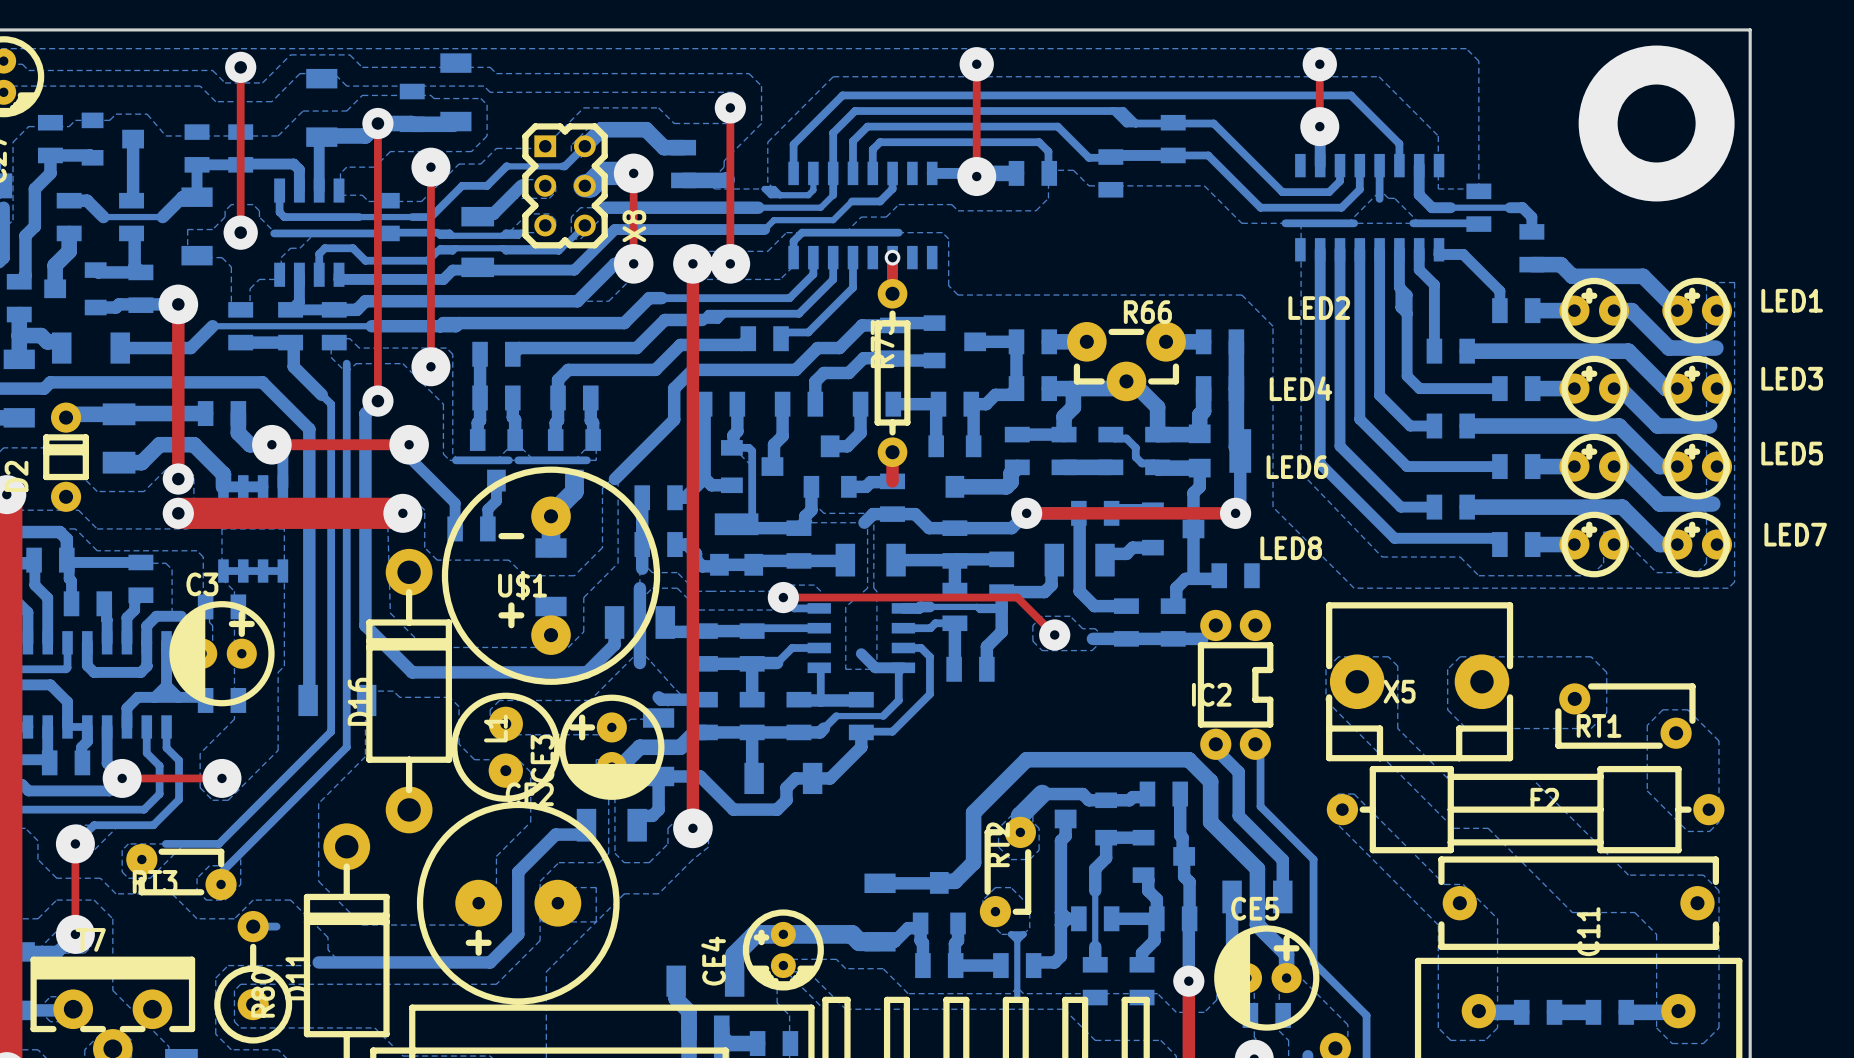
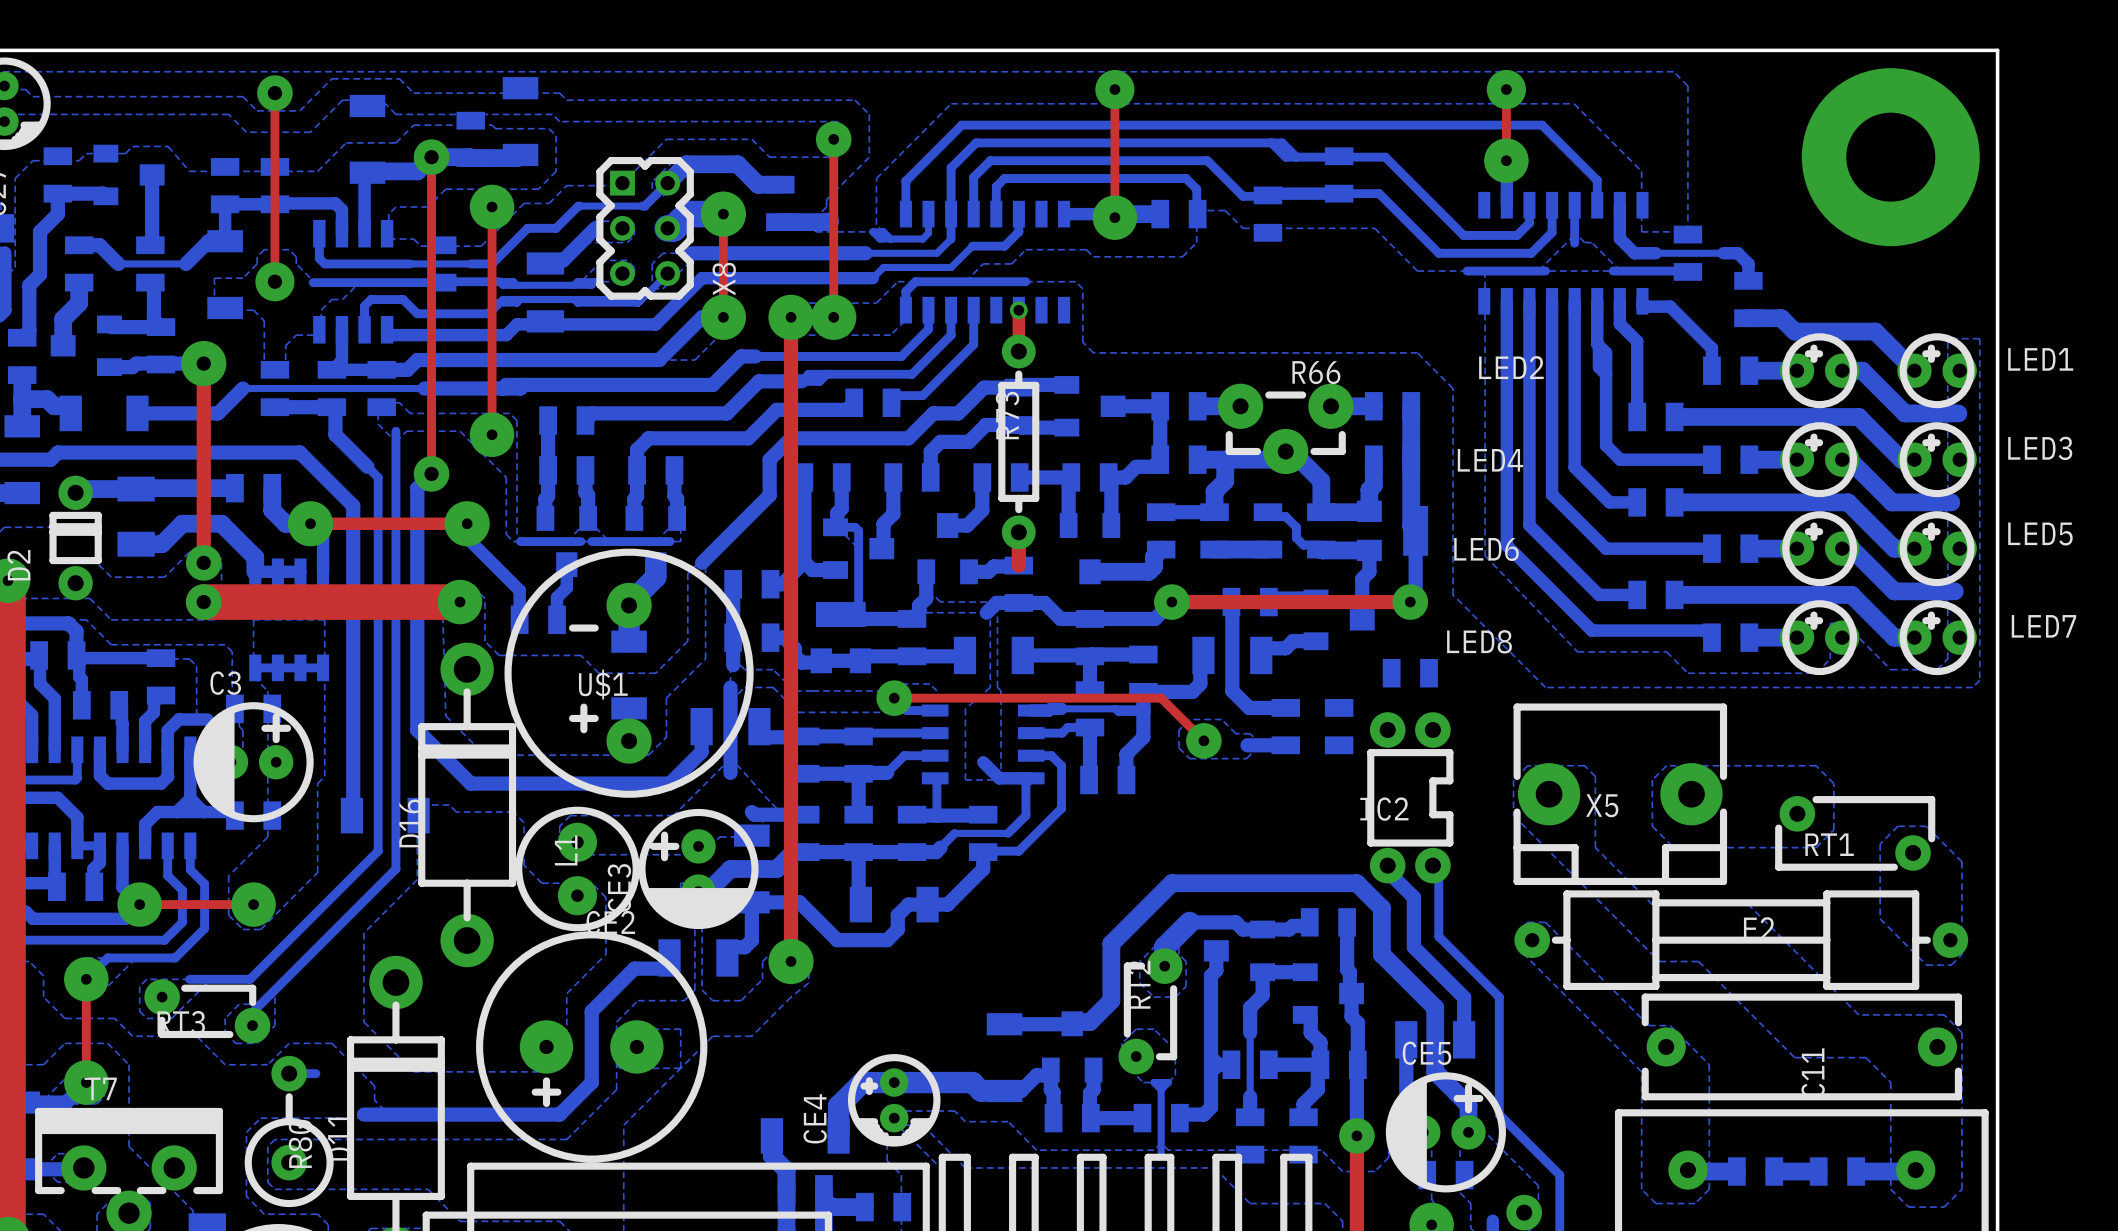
bottom track: (1193, 528) (1193, 577) (1191, 578) -> none
bottom track: (1219, 575) (1216, 578) (1185, 578) (1176, 588) (1176, 603) (1173, 606) -> none
bottom track: (1126, 638) (1202, 638) -> none

